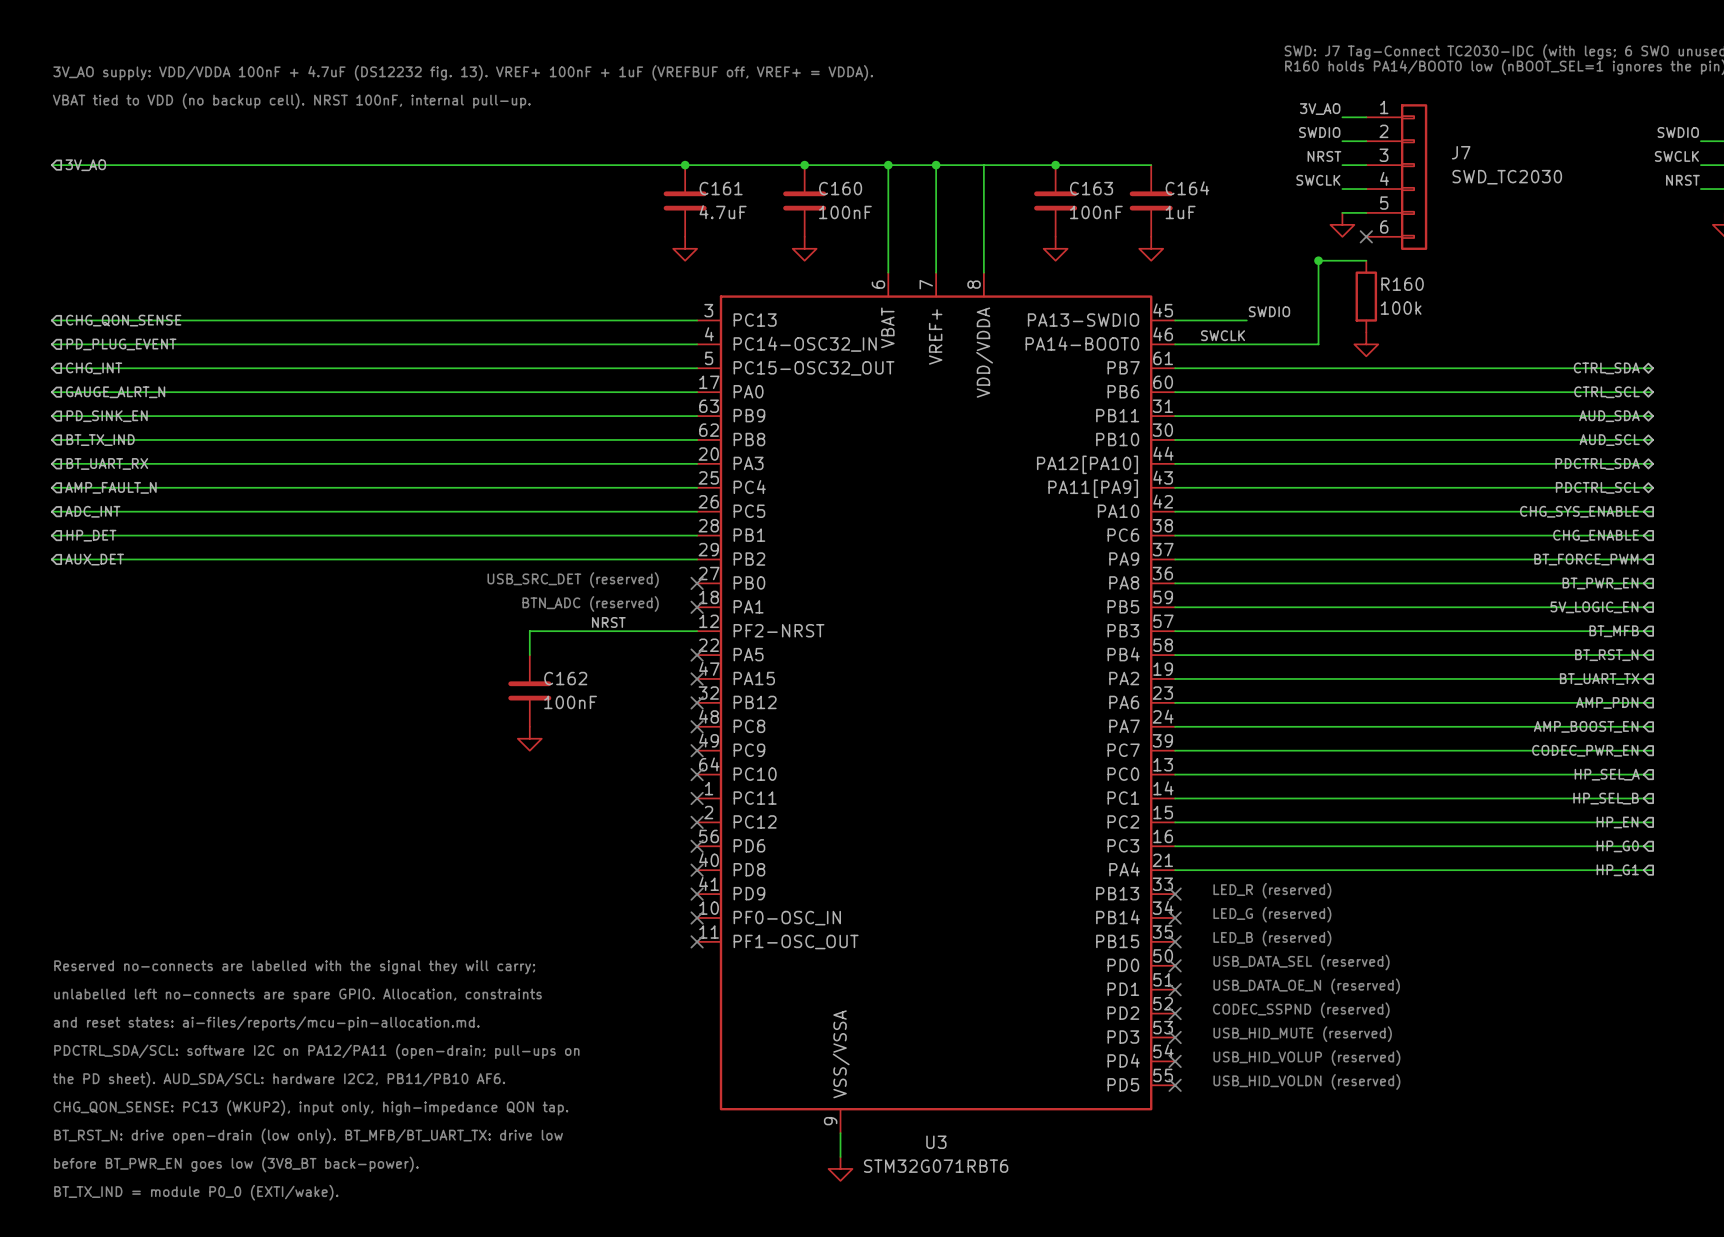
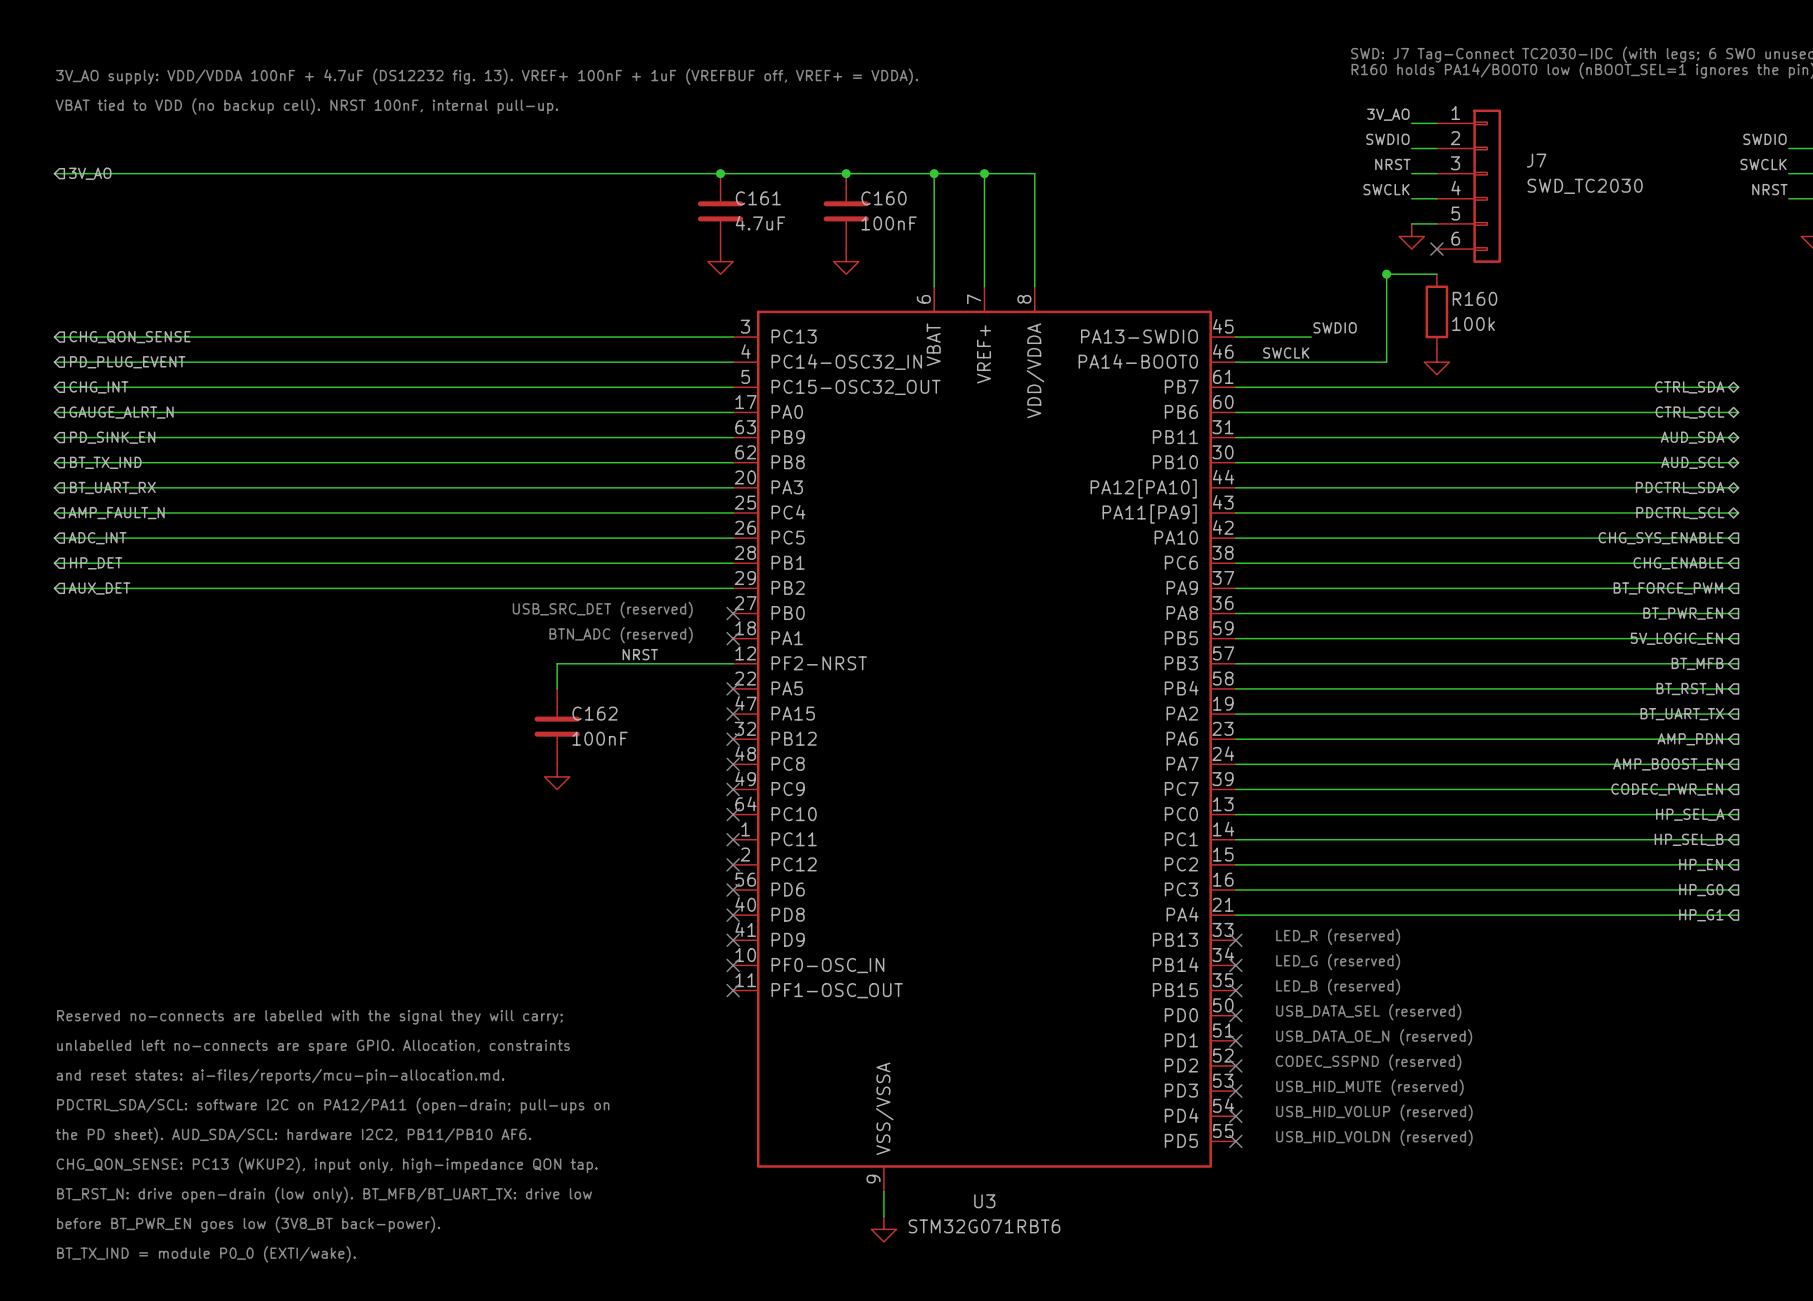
wire: (983, 165) (1151, 165) -> none
junction: (1055, 165) -> none
C163: 100nF (1055, 200) -> none
C164: 1uF (1151, 200) -> none
power symbol: (1055, 248) -> none
power symbol: (1151, 248) -> none

